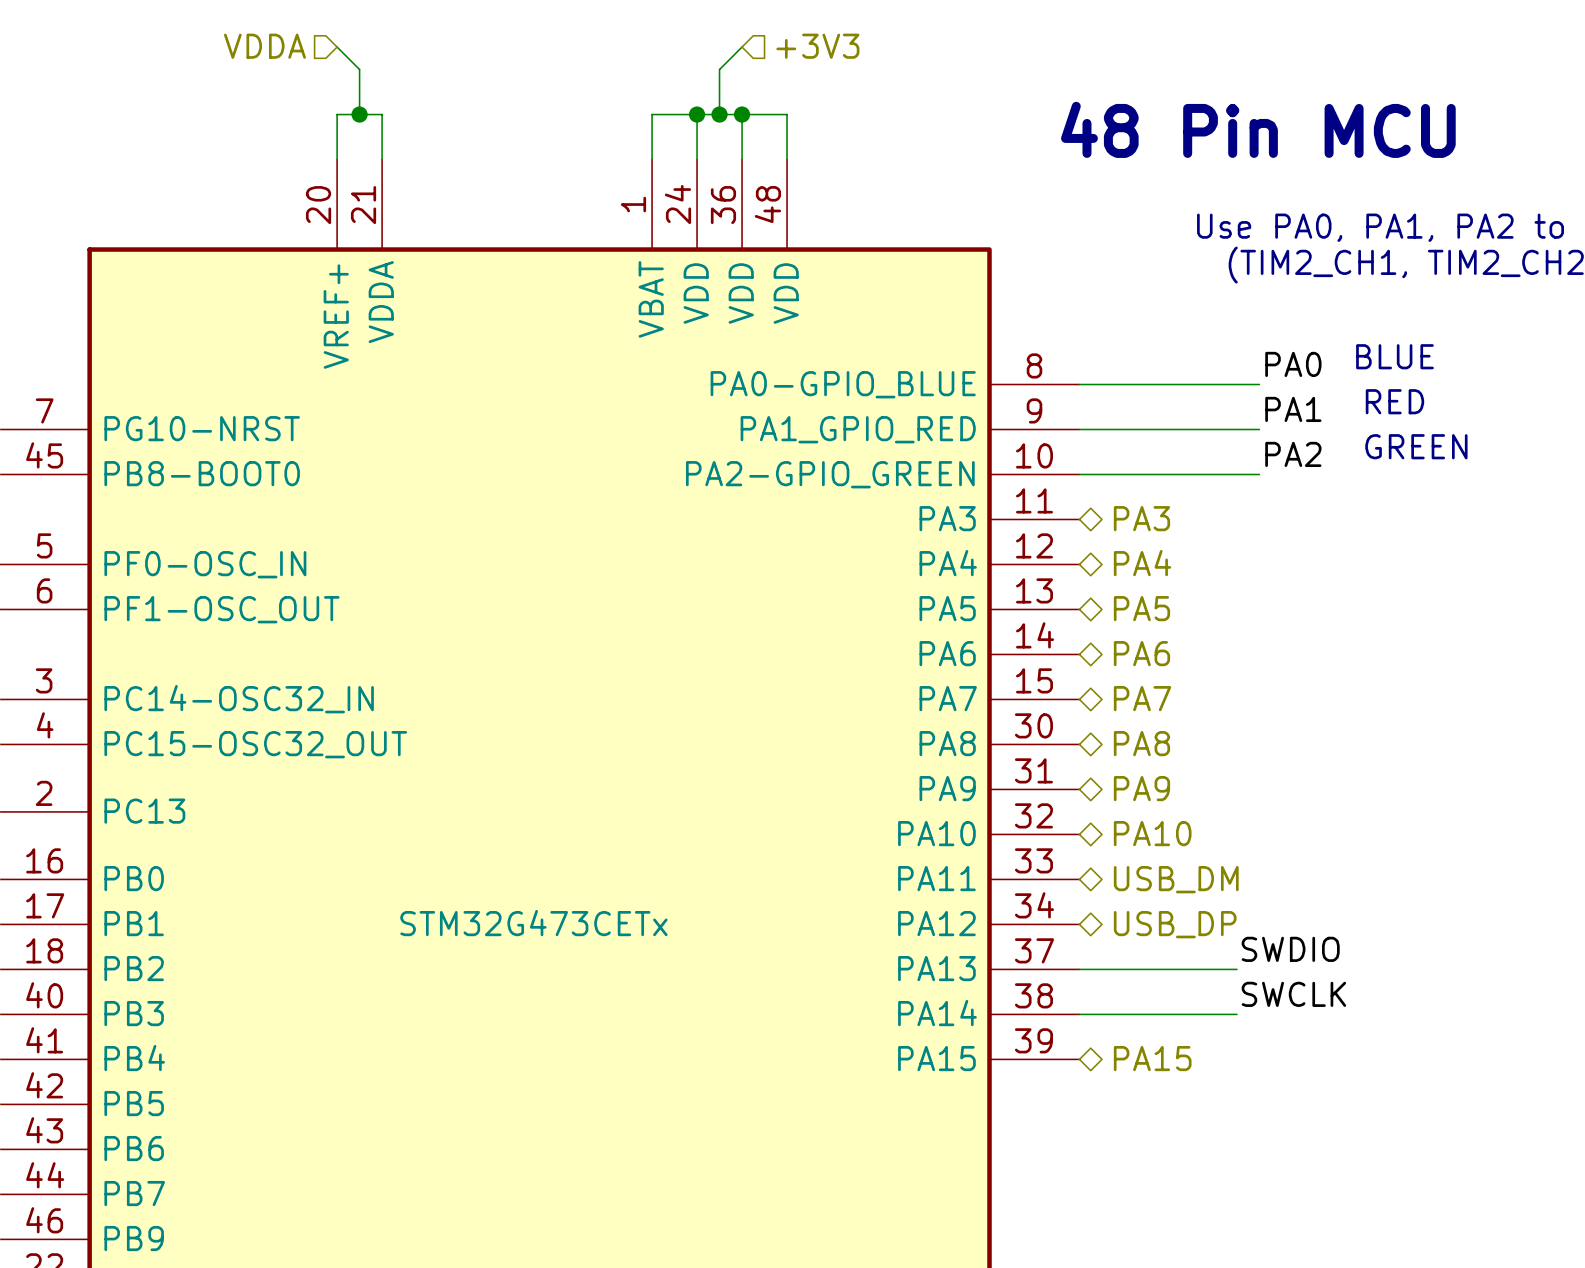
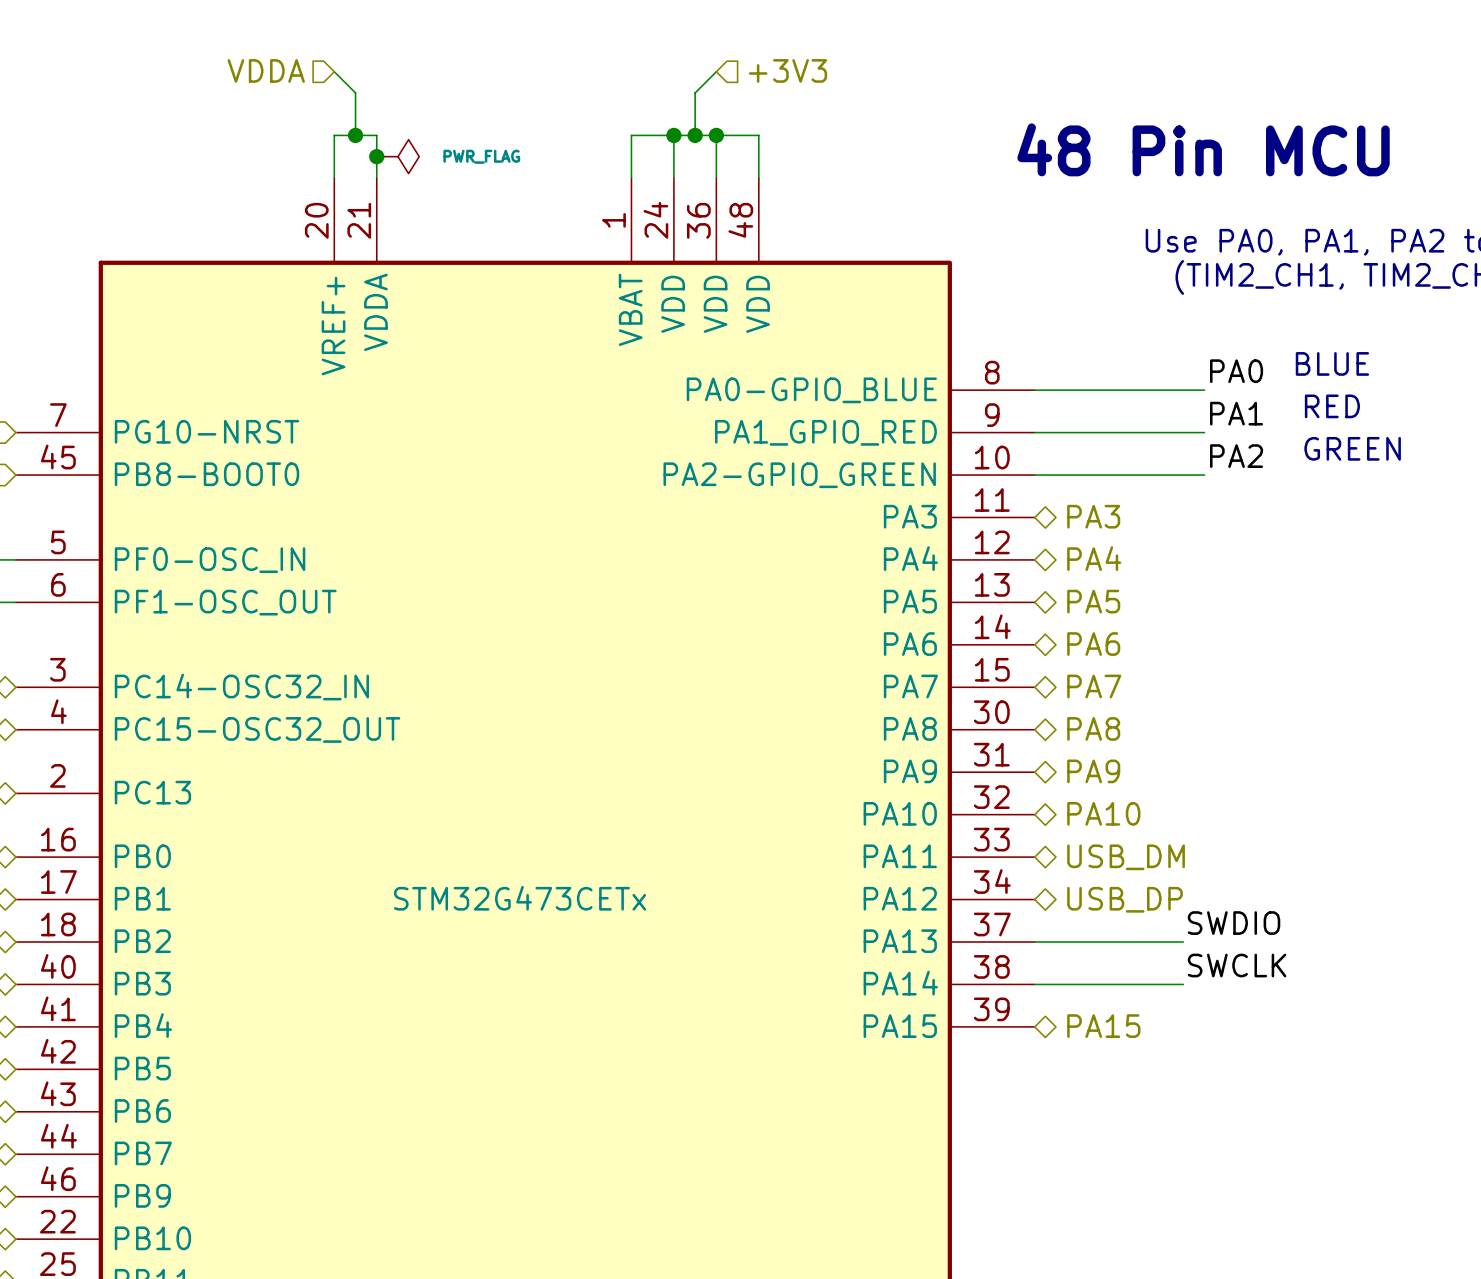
junction: none -> (376, 156)
power symbol: none -> PWR_FLAG (397, 156)

